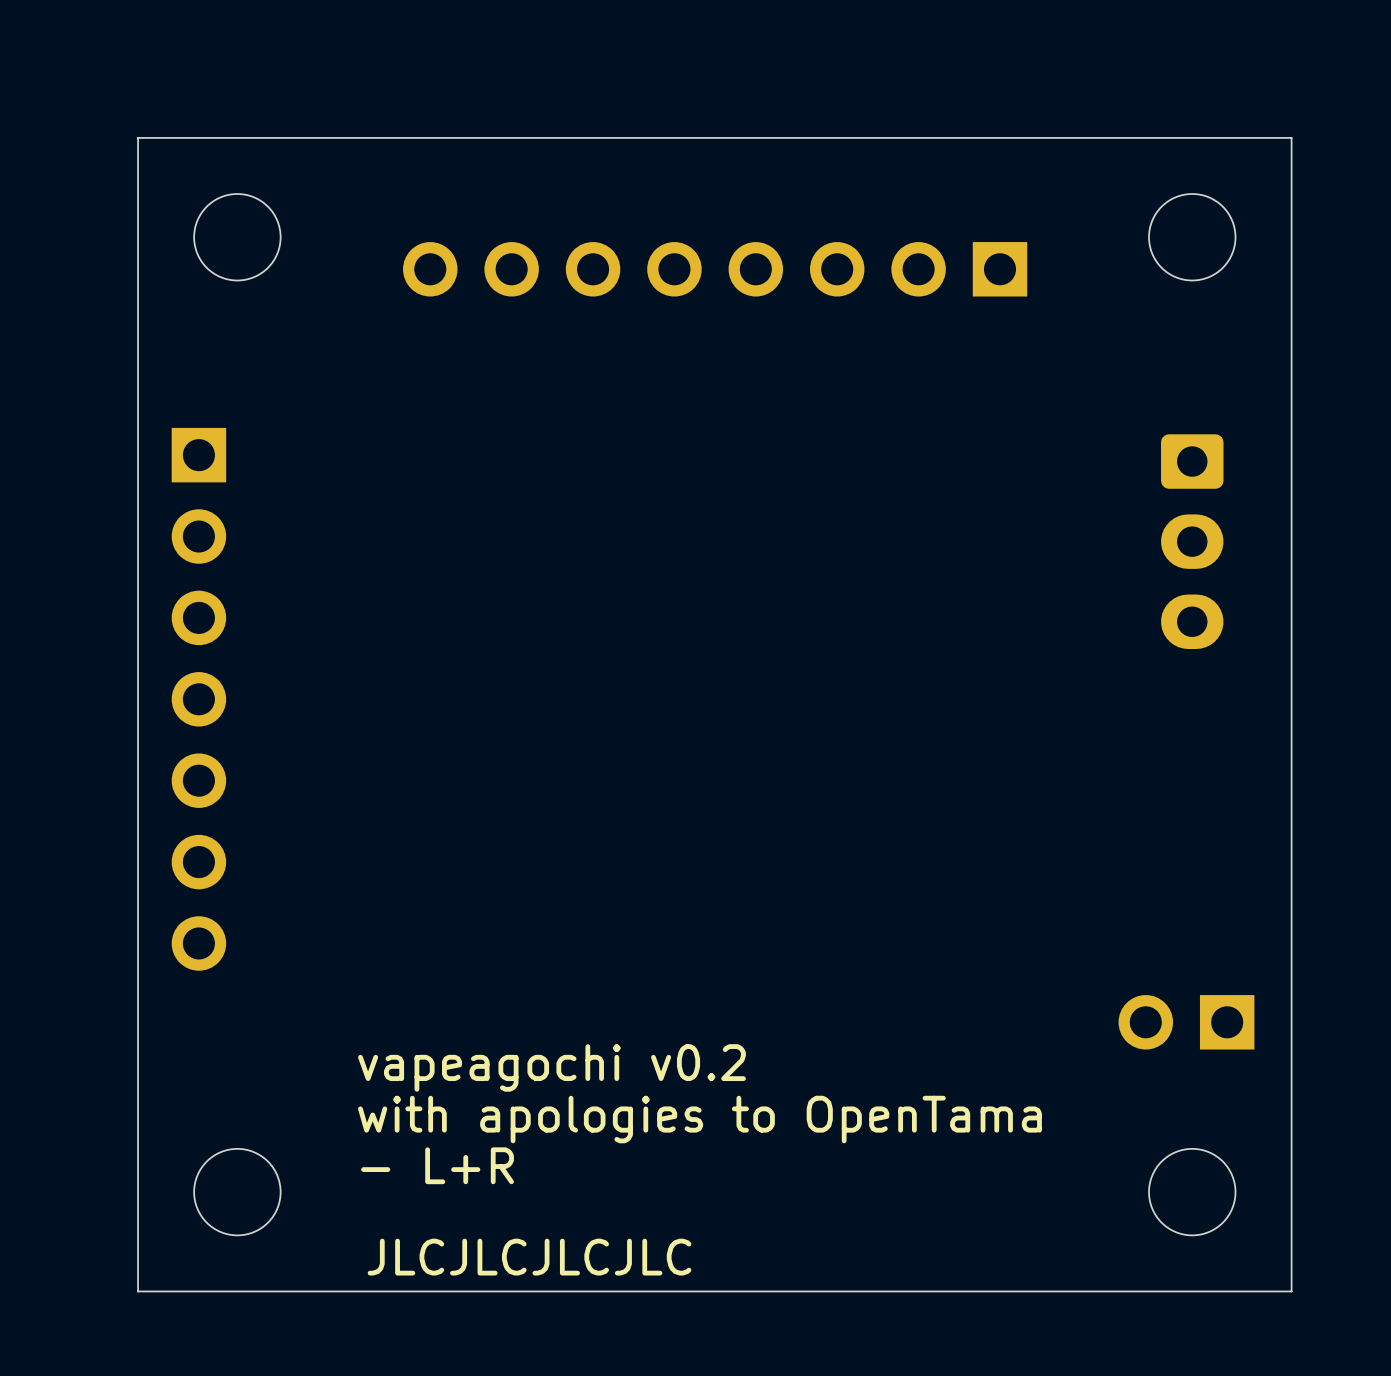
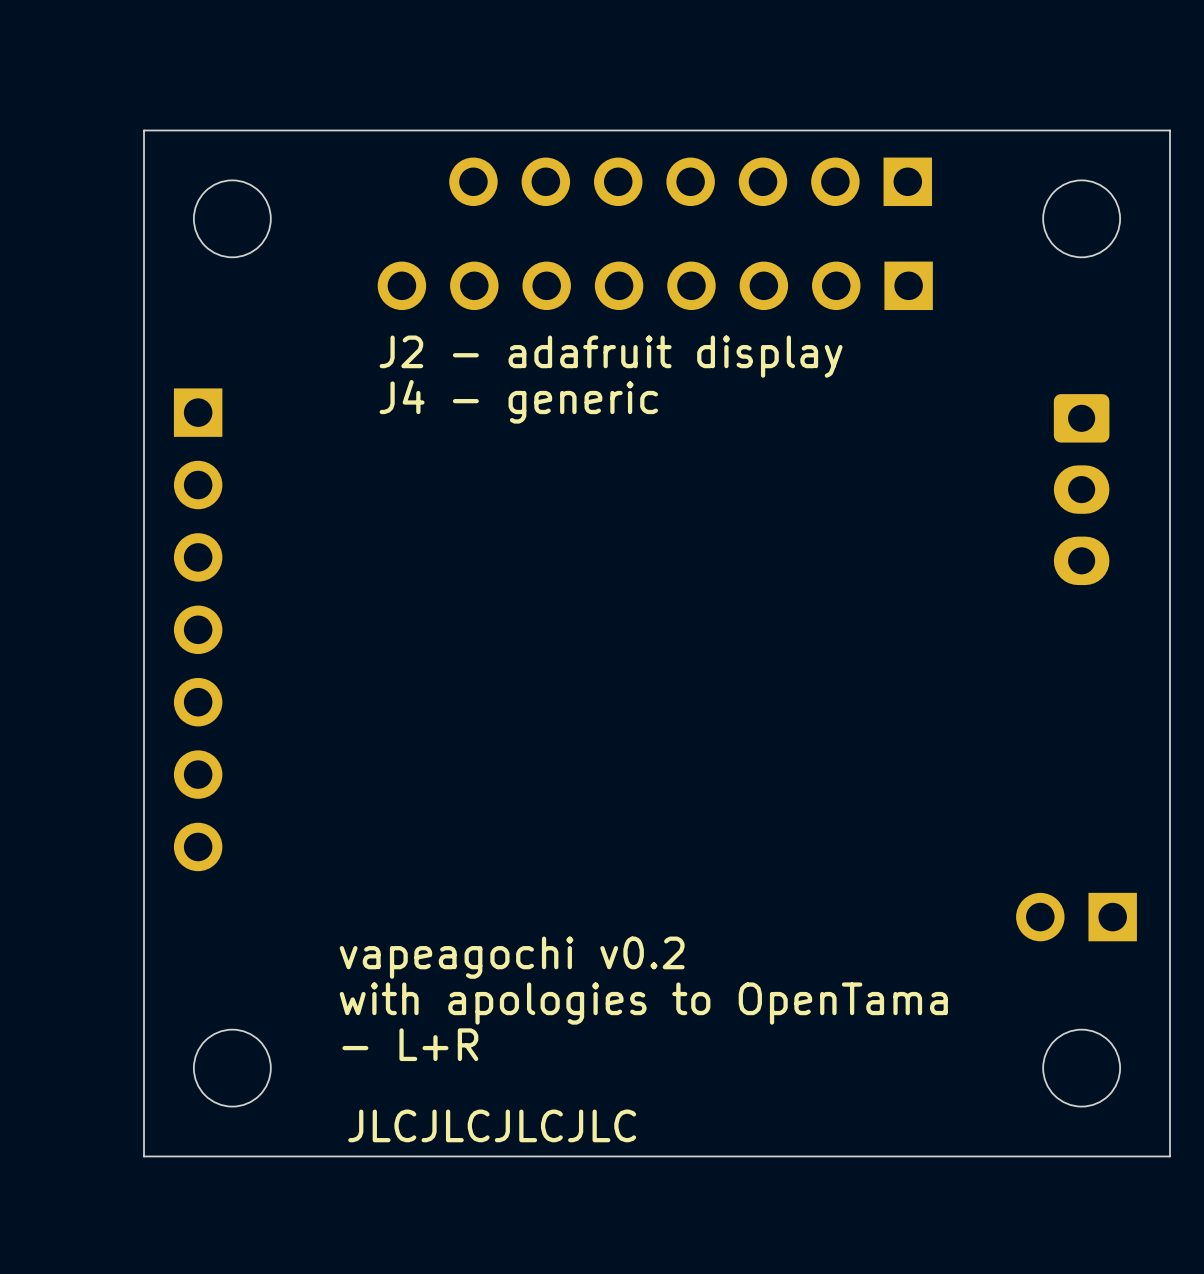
part: none -> (690, 181)
part position: (715, 269) -> (655, 285)
text: none -> J2 - adafruit display (611, 356)
text: none -> J4 - generic (518, 401)

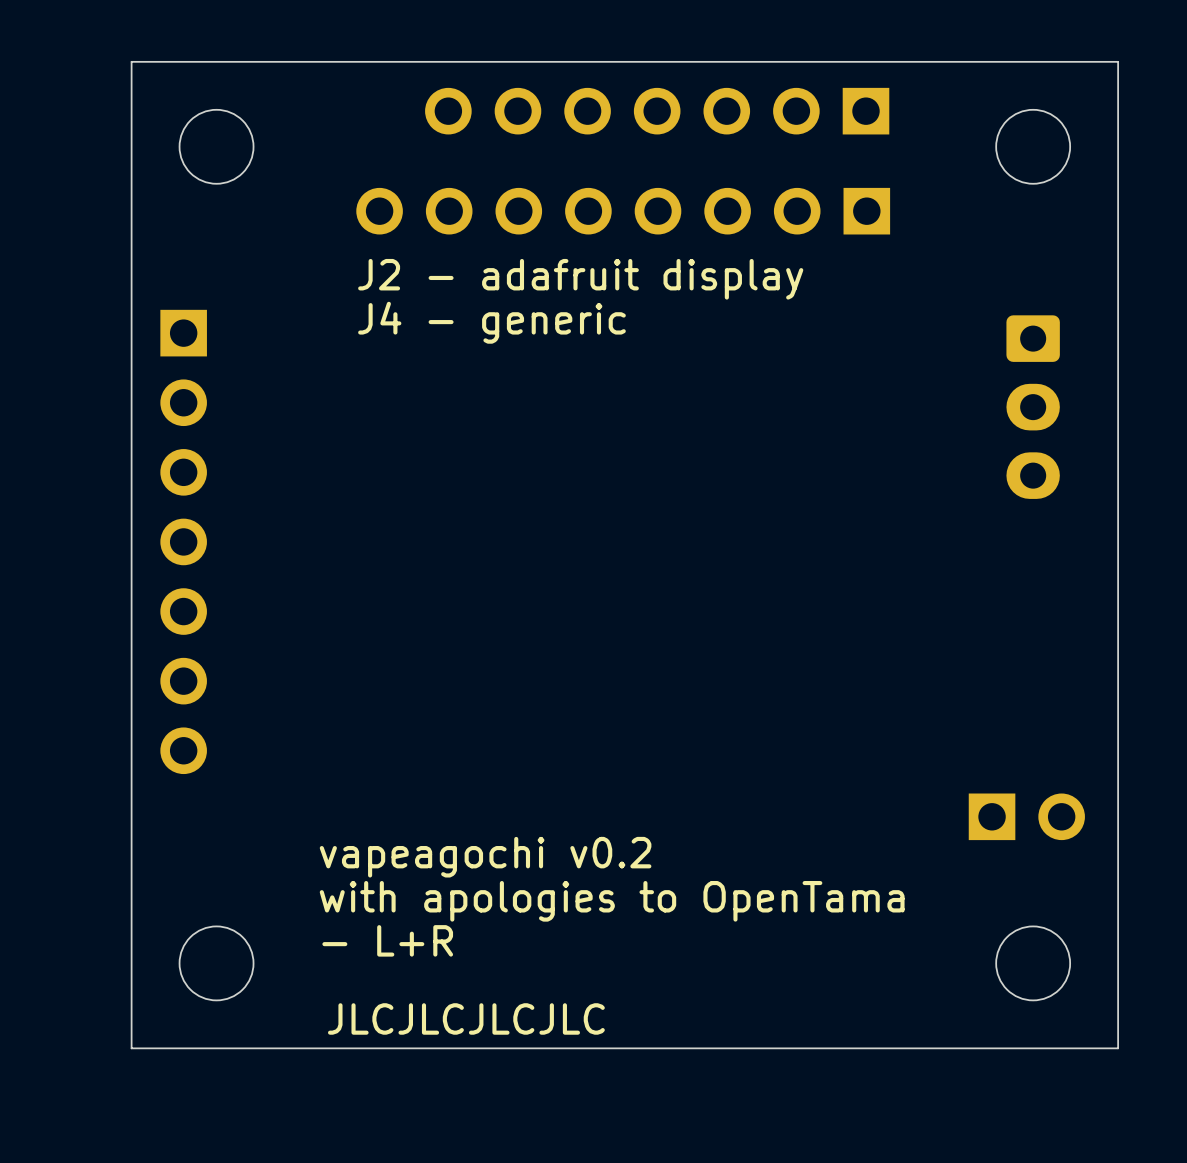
part rotation: 0° (1076, 917) -> 180° (1026, 816)

